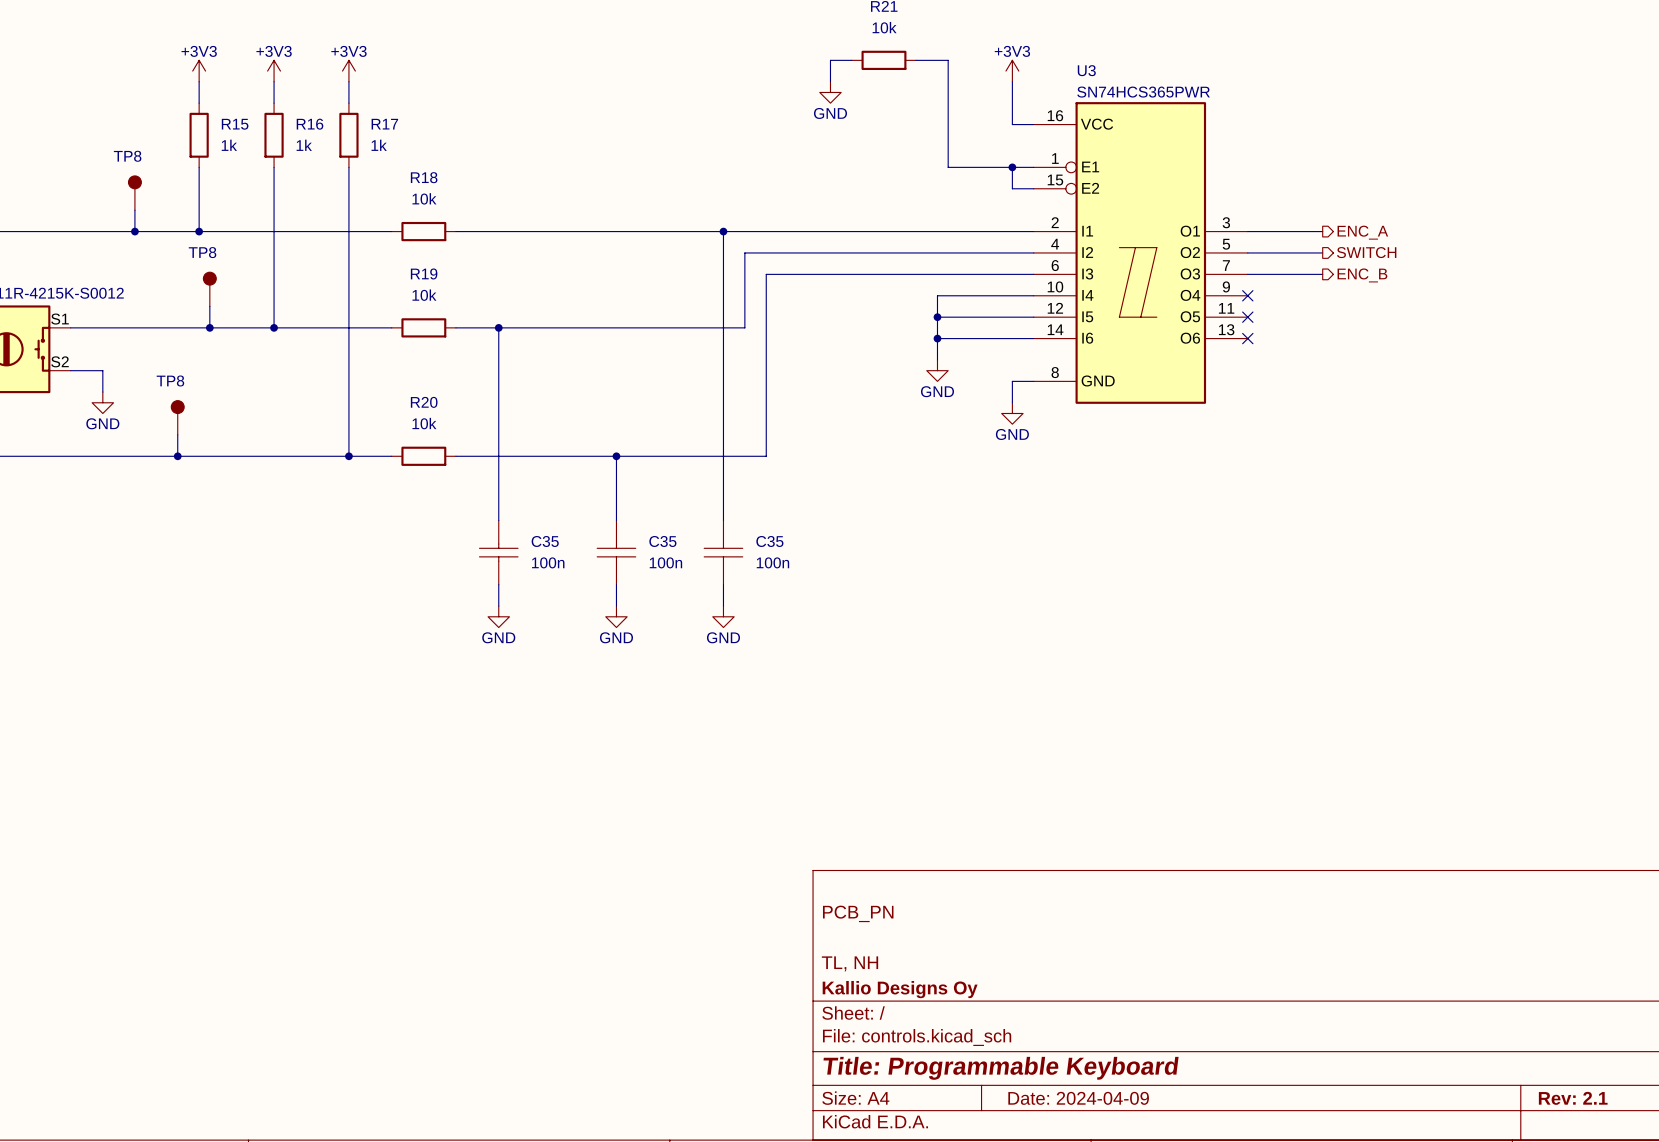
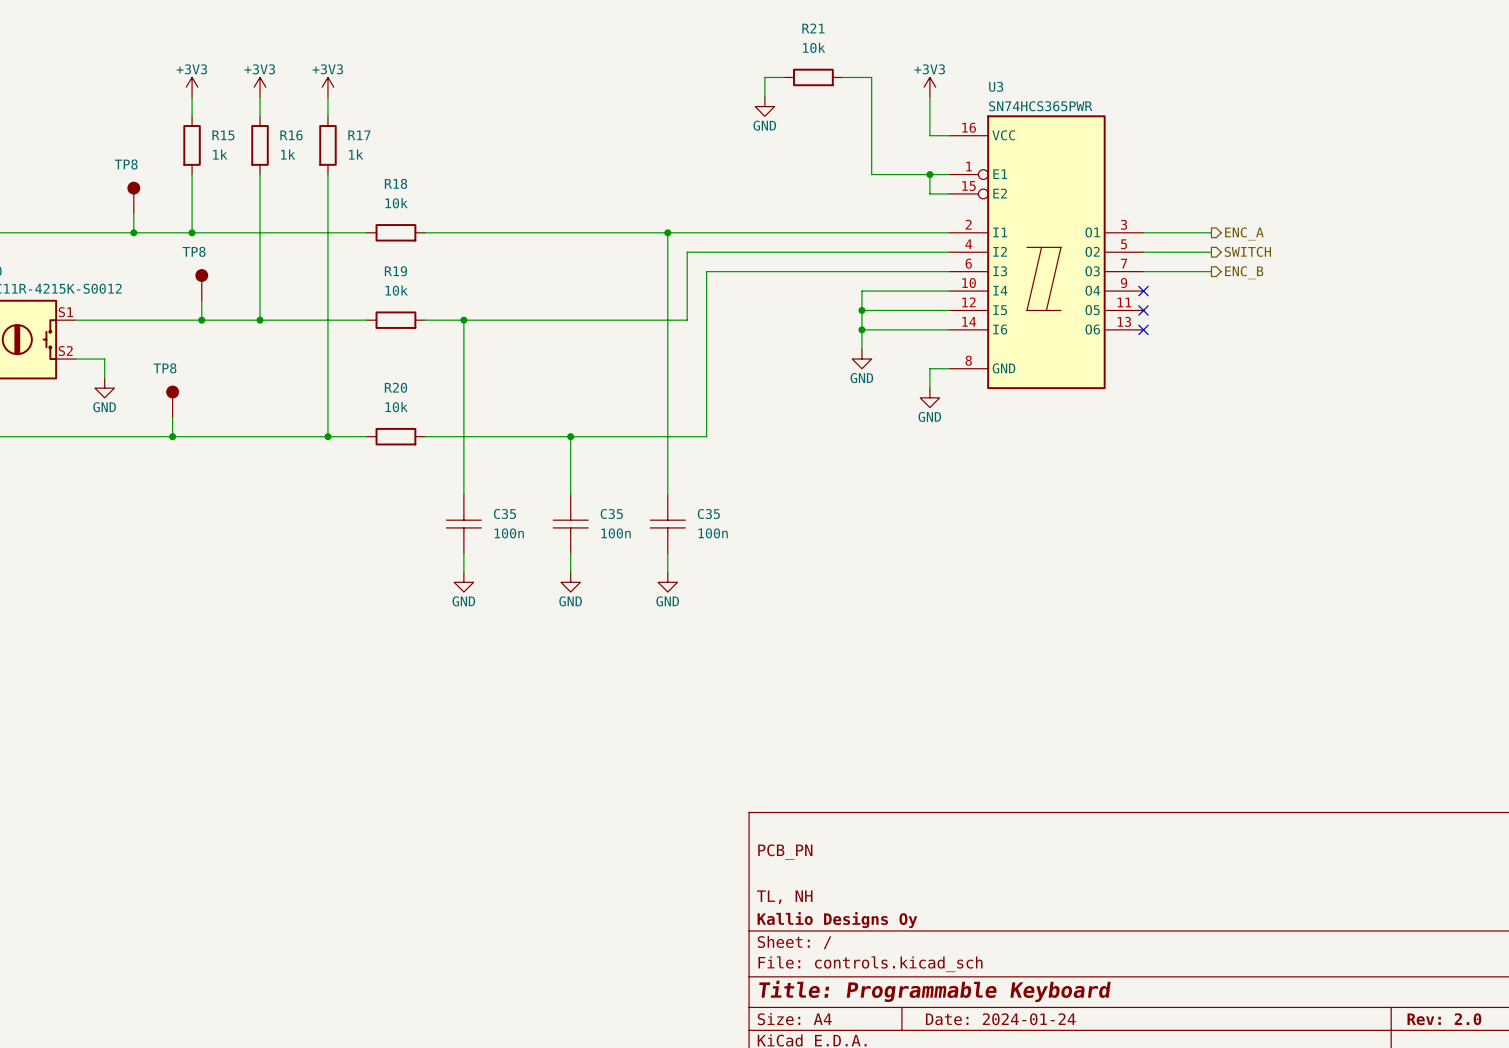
title block: Date: 2024-04-09 (1078, 1098) -> Date: 2024-01-24 (1000, 1019)
title block: Rev: 2.1 (1573, 1098) -> Rev: 2.0 (1444, 1019)

